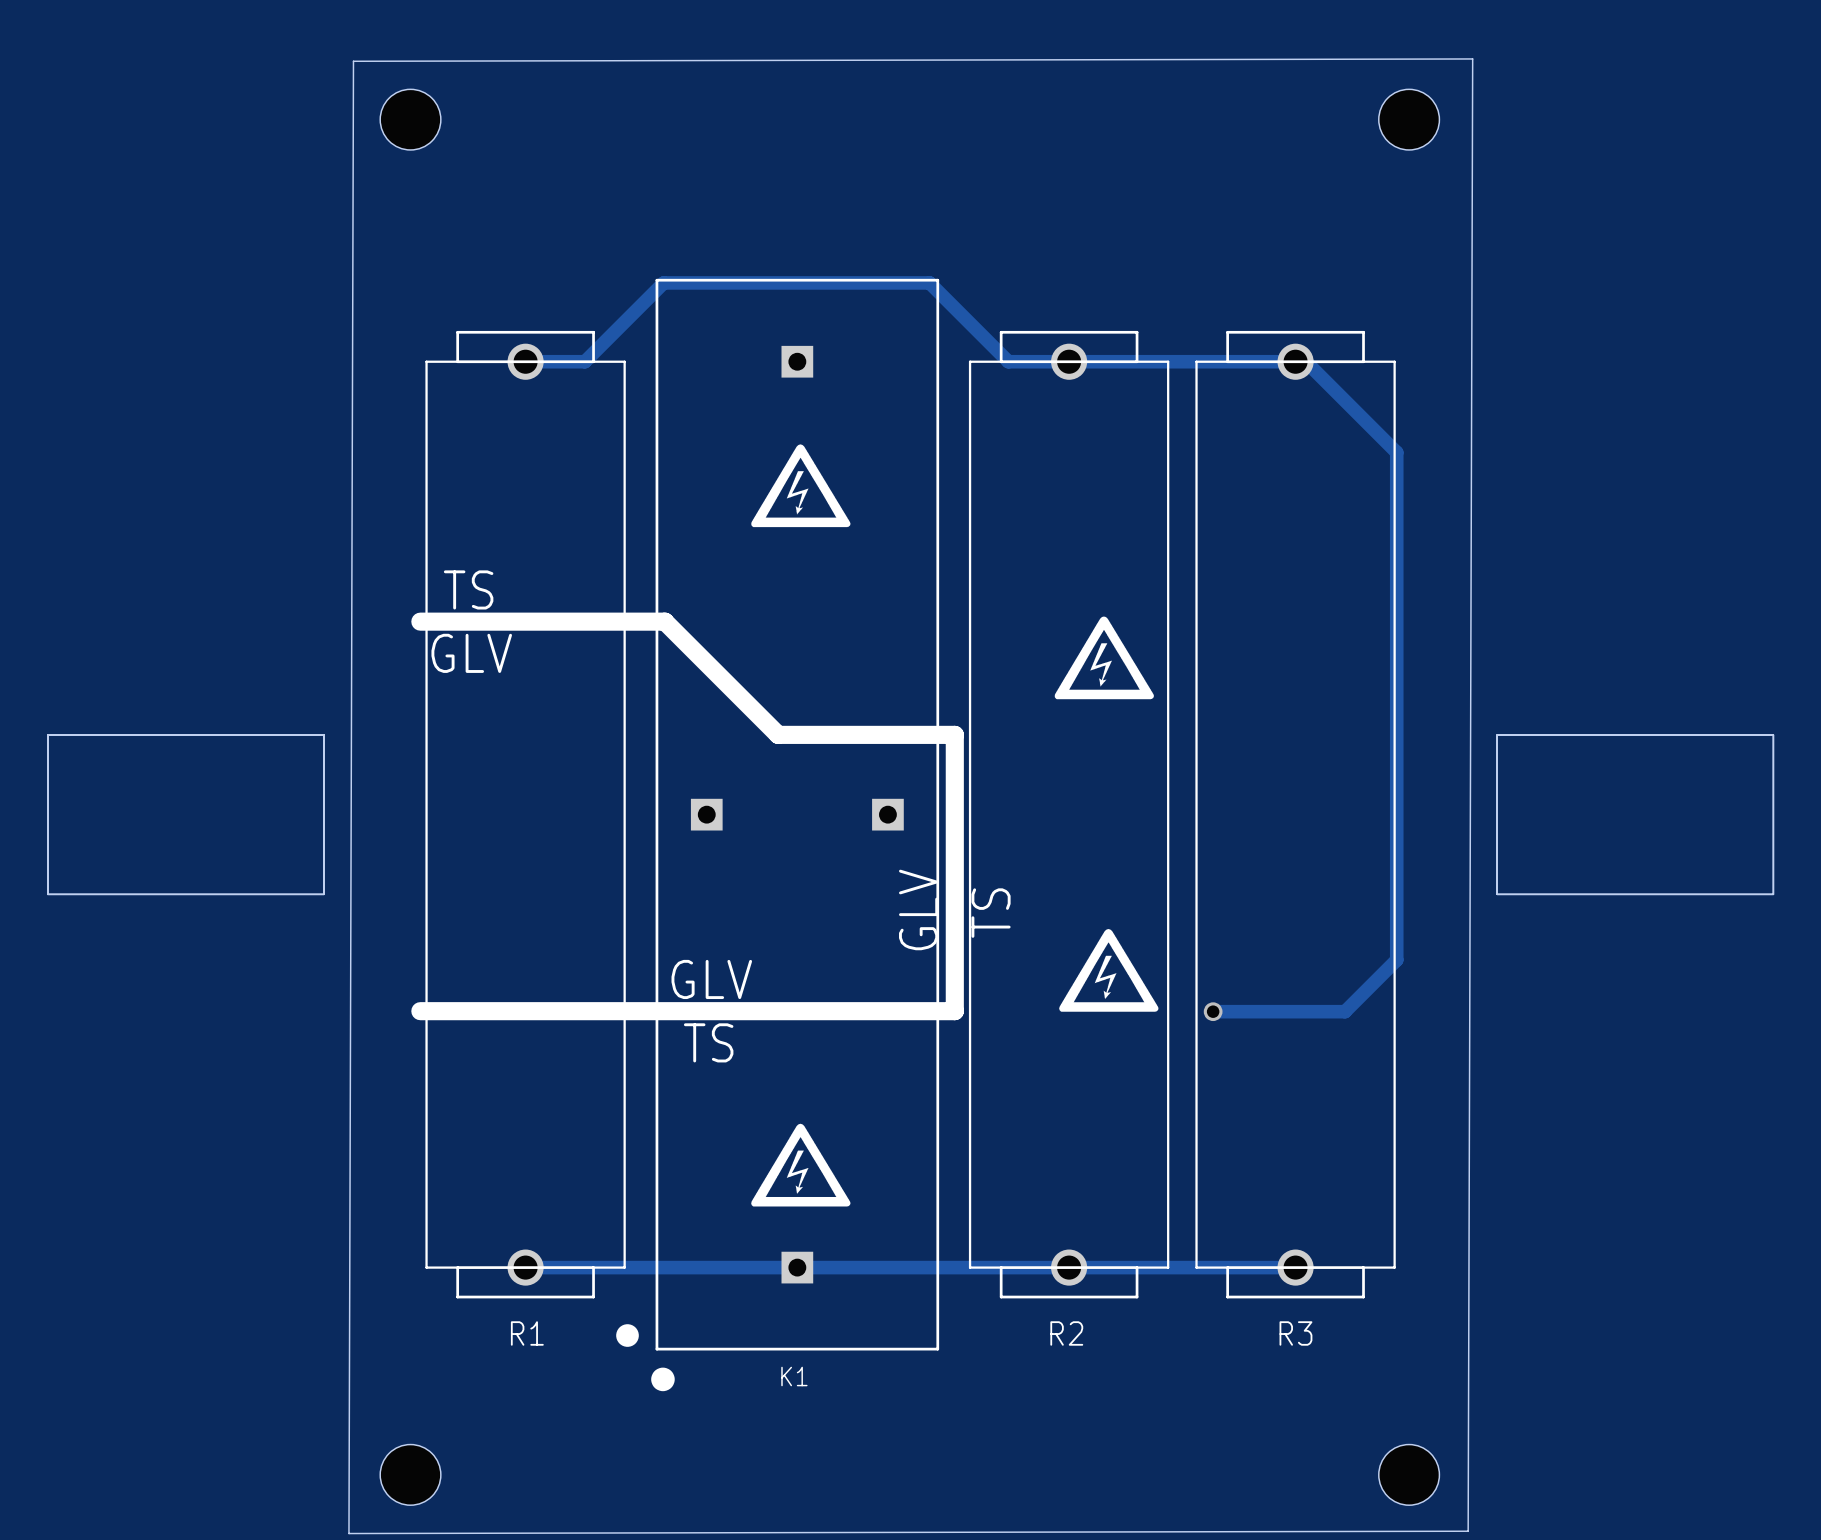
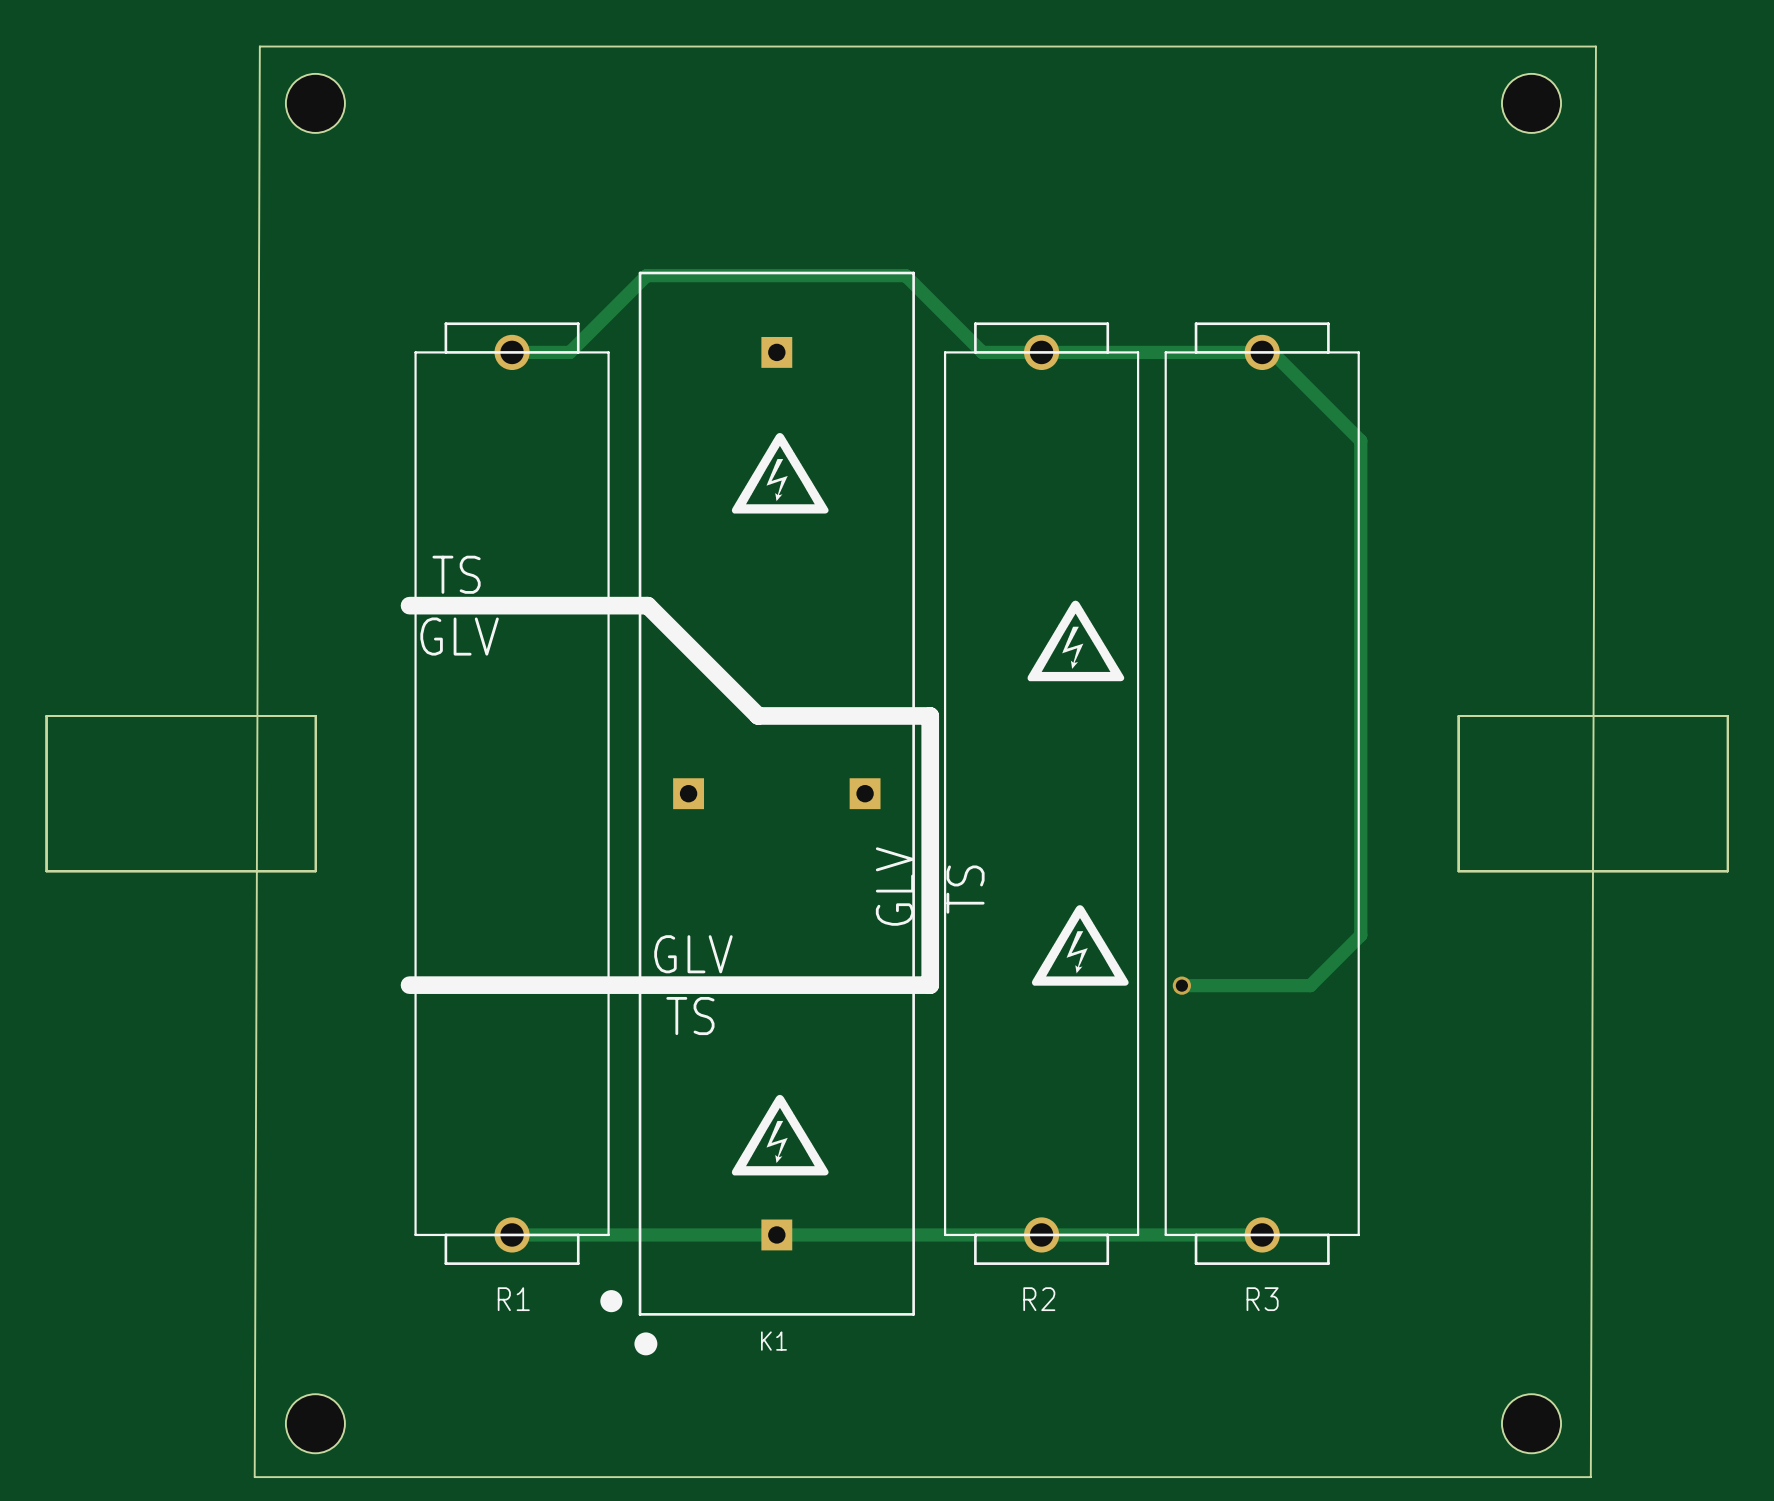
board edge: (1472, 58) (1468, 1531) (348, 1533) (353, 61) (1472, 58) -> (259, 46) (254, 1477) (1590, 1477) (1595, 46) (259, 46)
part position: (410, 119) -> (315, 103)
part position: (1409, 119) -> (1531, 103)
part position: (410, 1474) -> (315, 1423)
part position: (1409, 1474) -> (1531, 1423)

